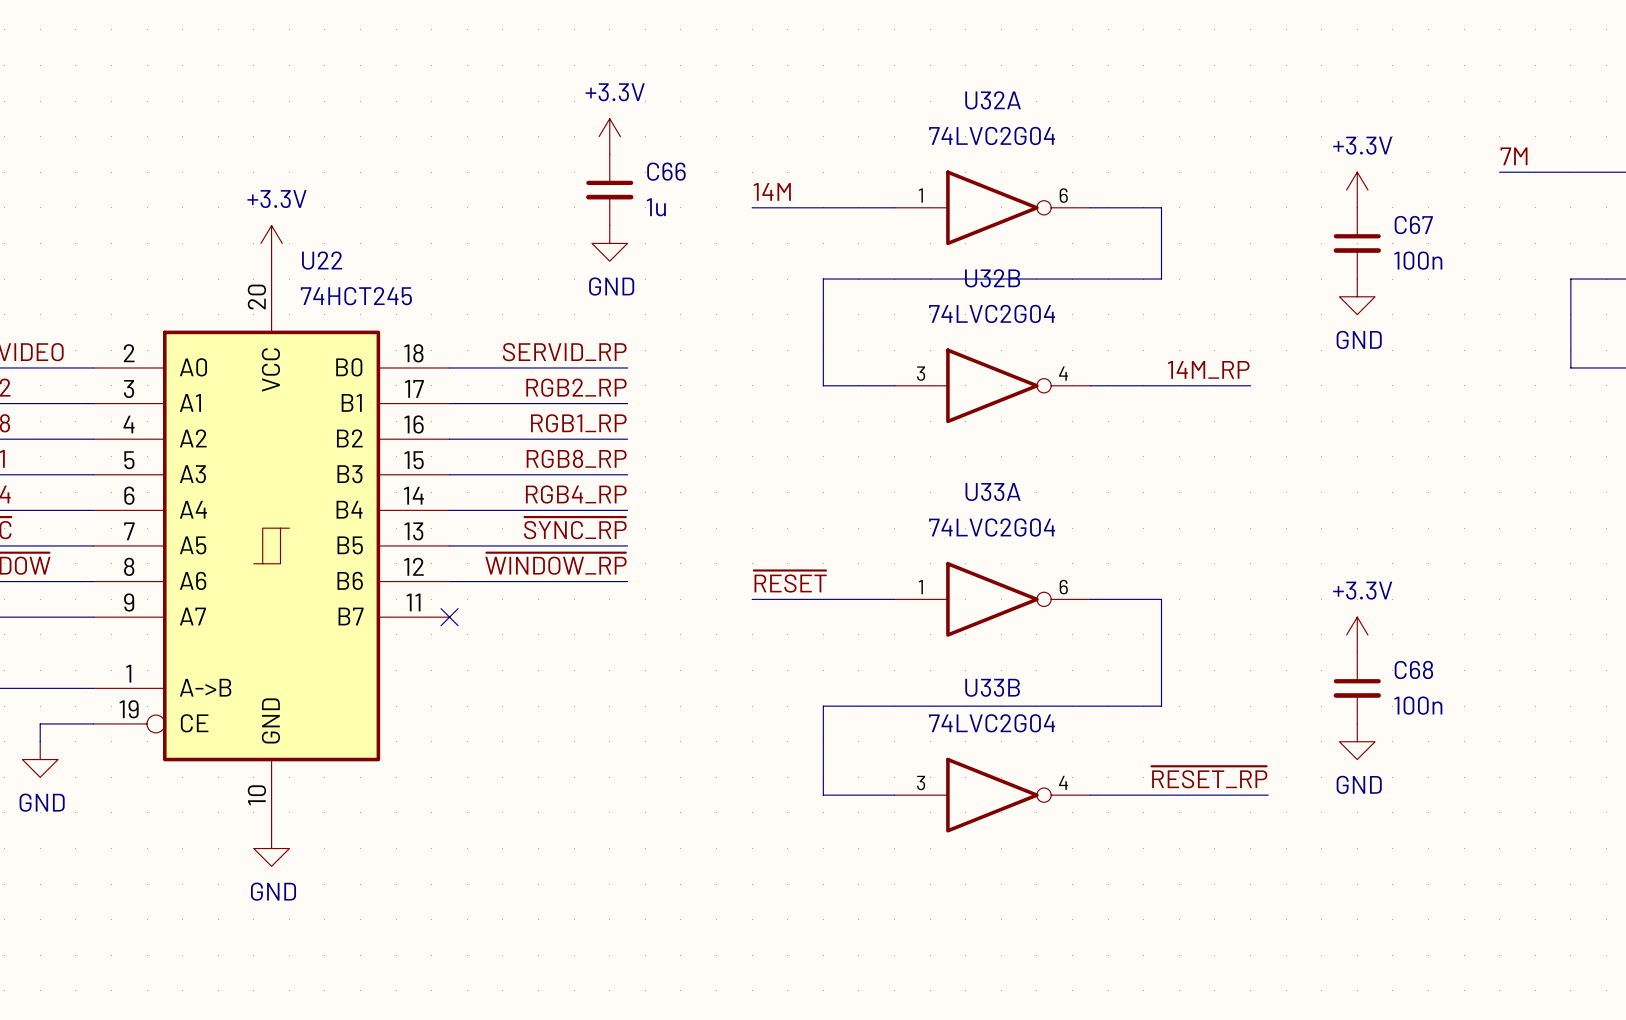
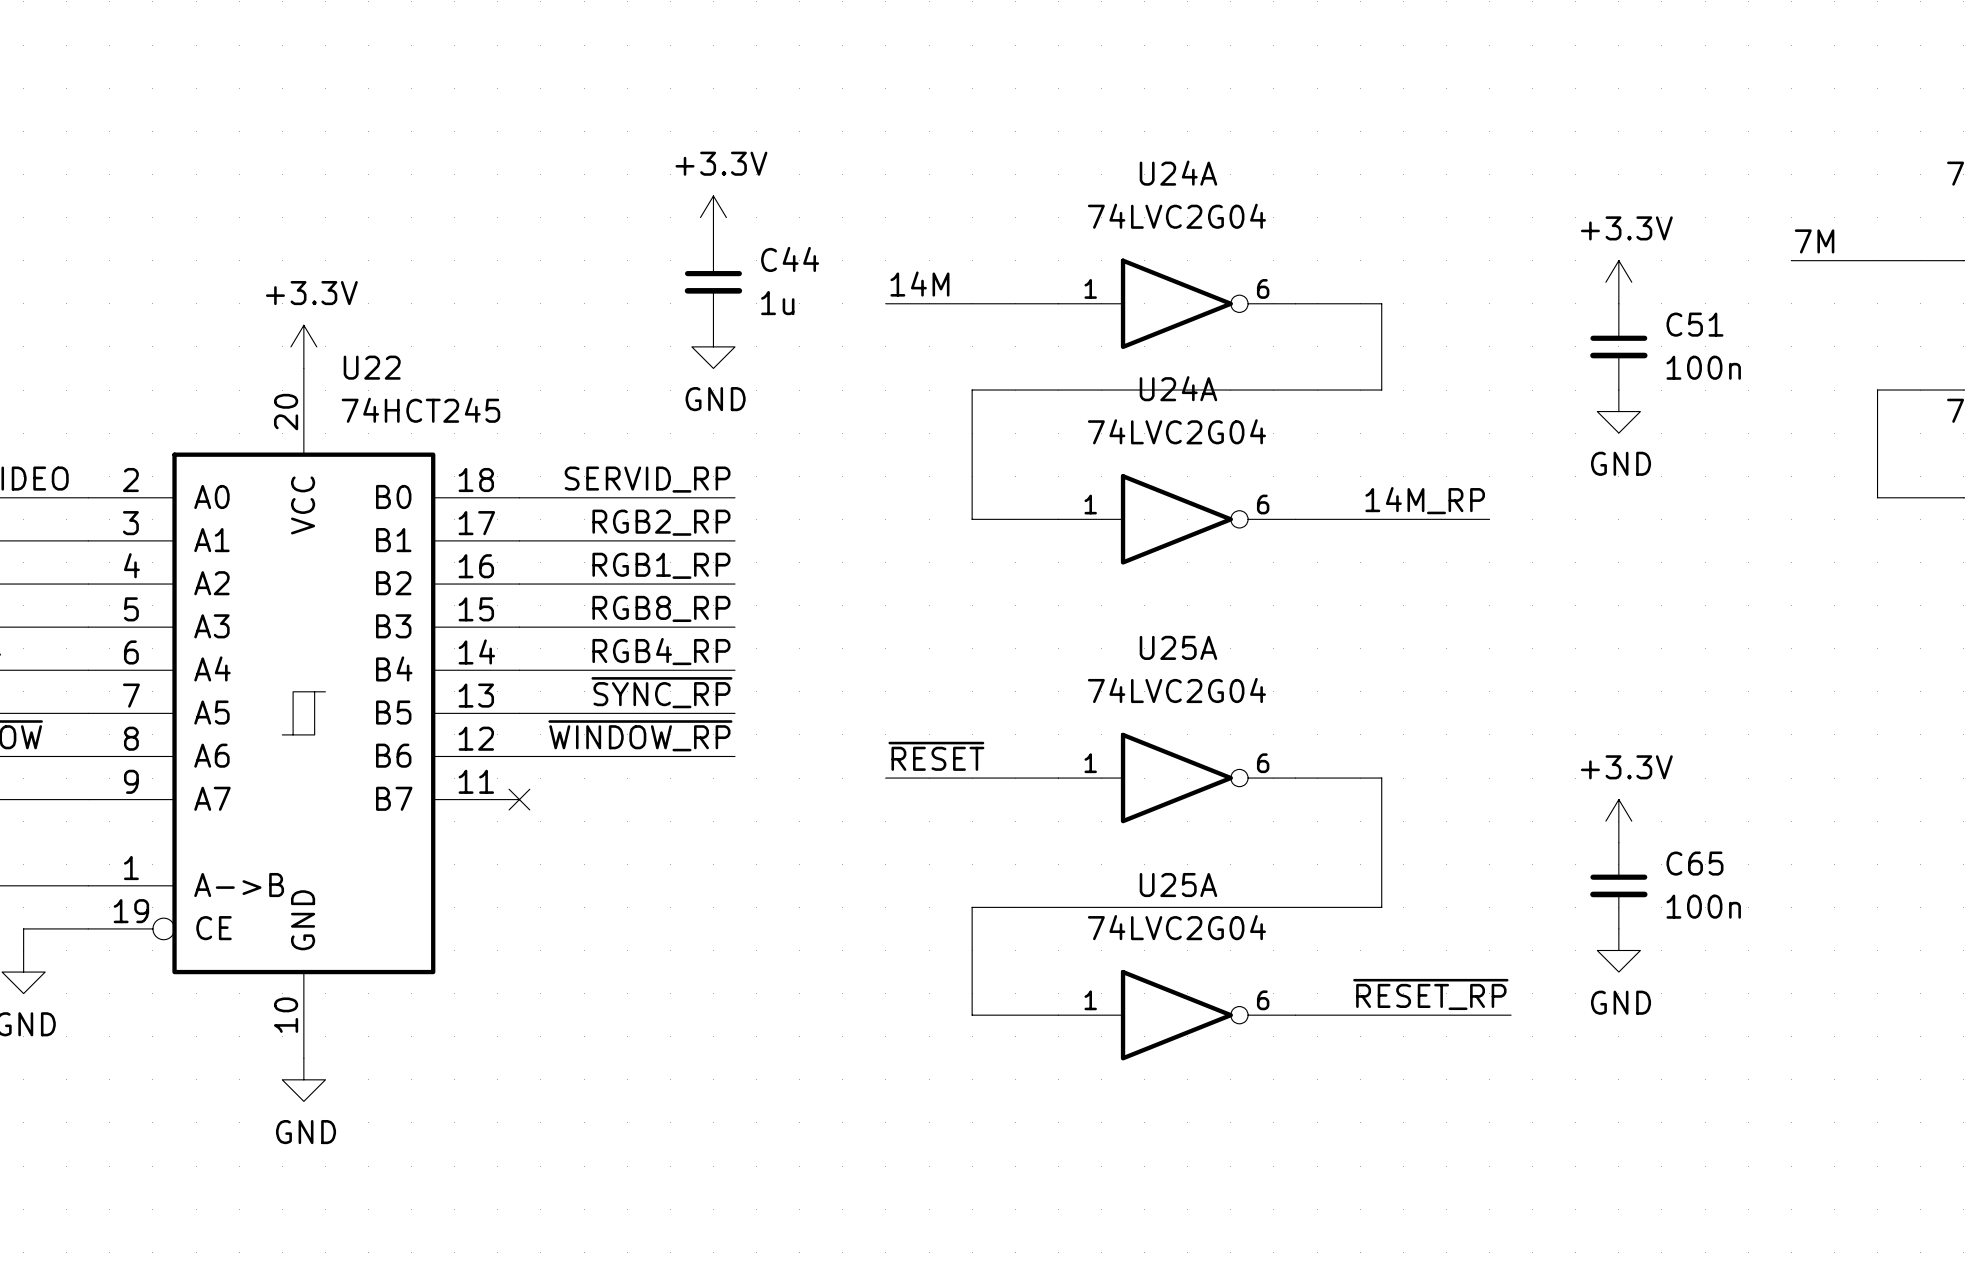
U32A name: U32A (993, 100) -> U24A (1178, 173)
C66 name: C66 (666, 171) -> C44 (790, 259)
C67 name: C67 (1413, 225) -> C51 (1694, 324)
U32B name: U32B (992, 278) -> U24A (1178, 388)
U32B pin number: 3 (921, 373) -> 1 (1090, 504)
U32B pin number: 4 (1063, 373) -> 6 (1263, 504)
U33A name: U33A (993, 492) -> U25A (1178, 647)
C68 name: C68 (1413, 669) -> C65 (1694, 863)
U33B name: U33B (992, 687) -> U25A (1178, 885)
U33B pin number: 3 (921, 782) -> 1 (1090, 1000)
U33B pin number: 4 (1063, 782) -> 6 (1263, 1000)

